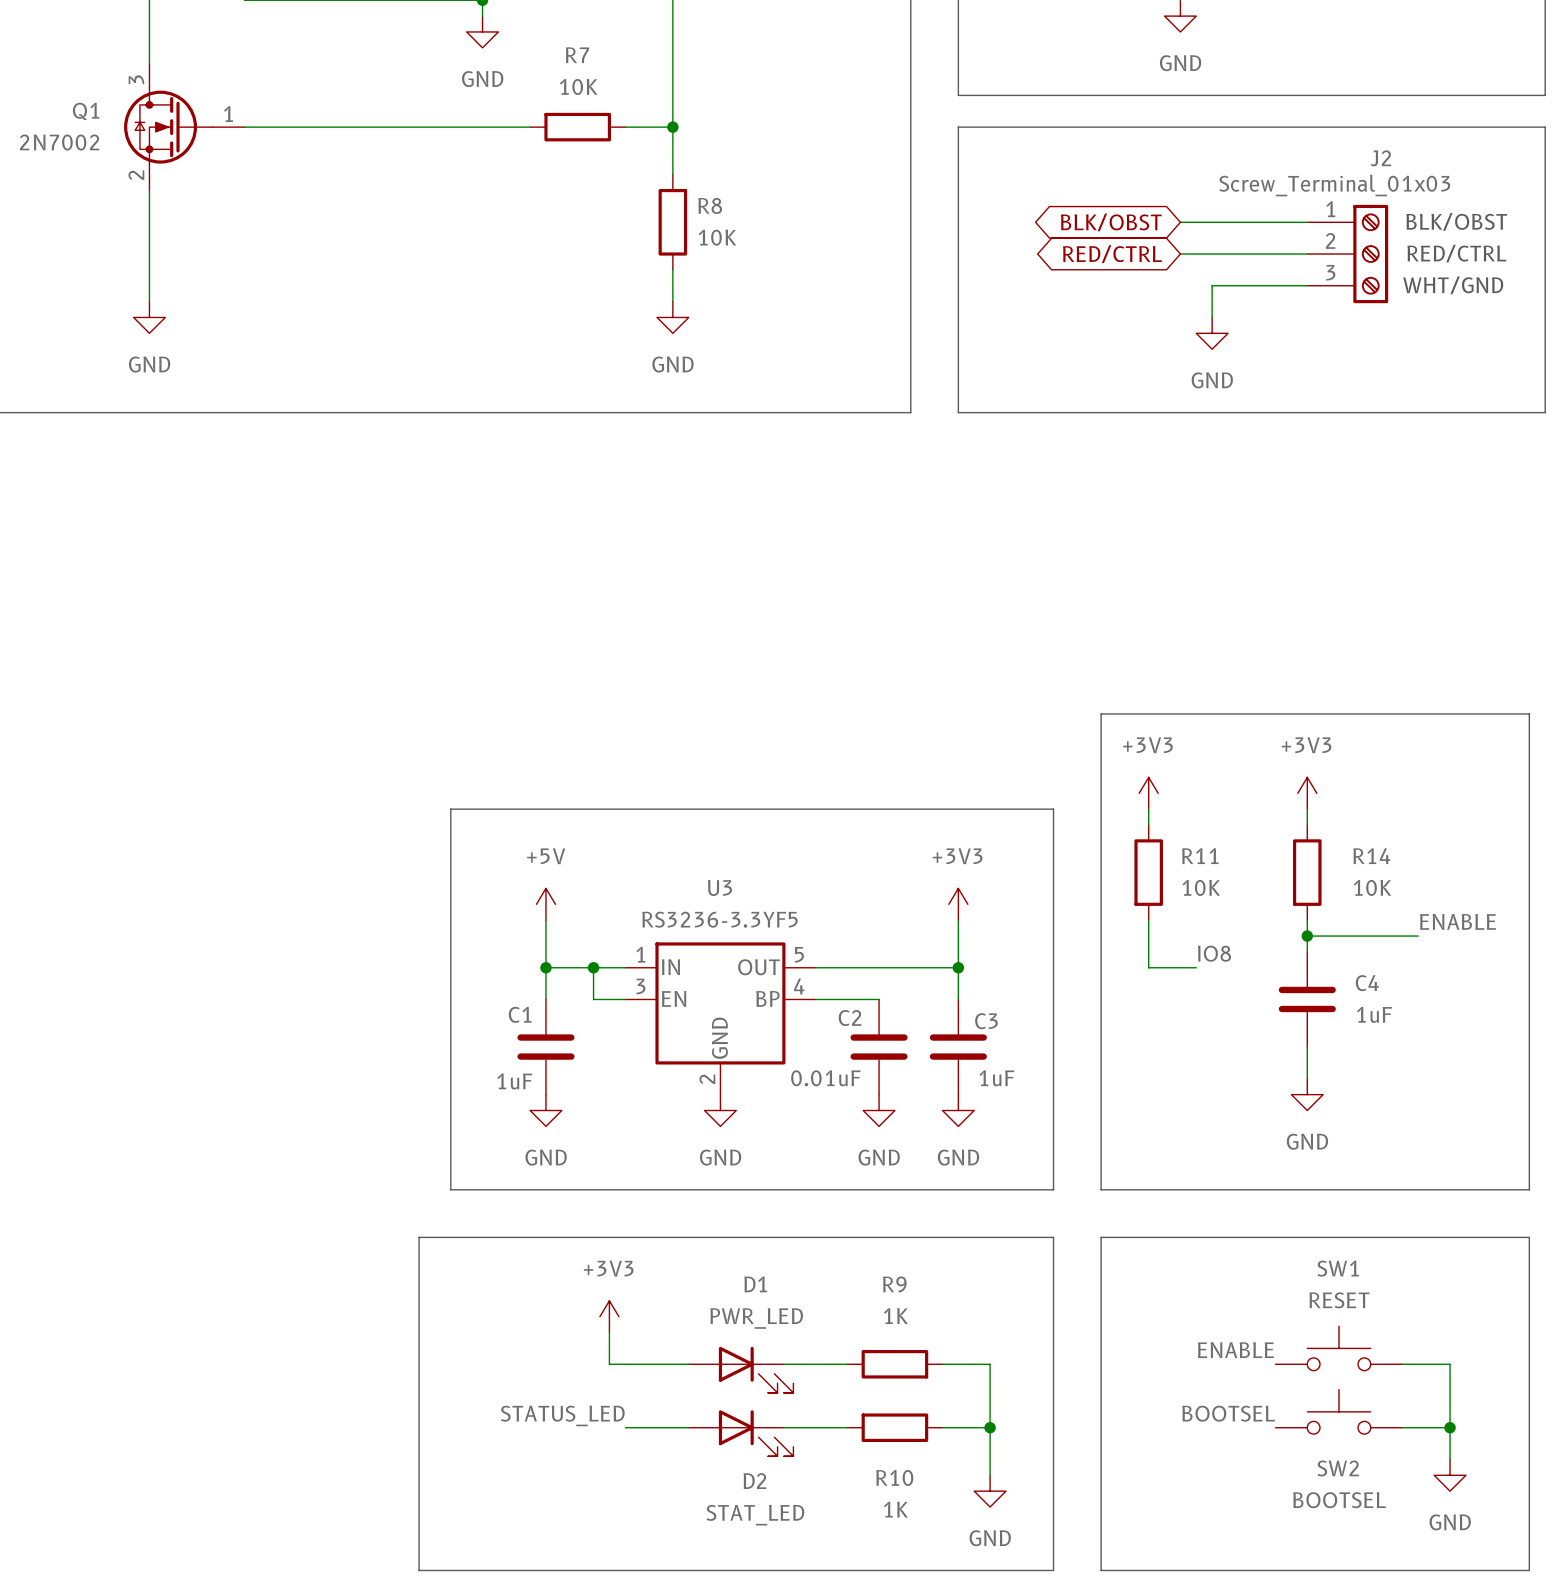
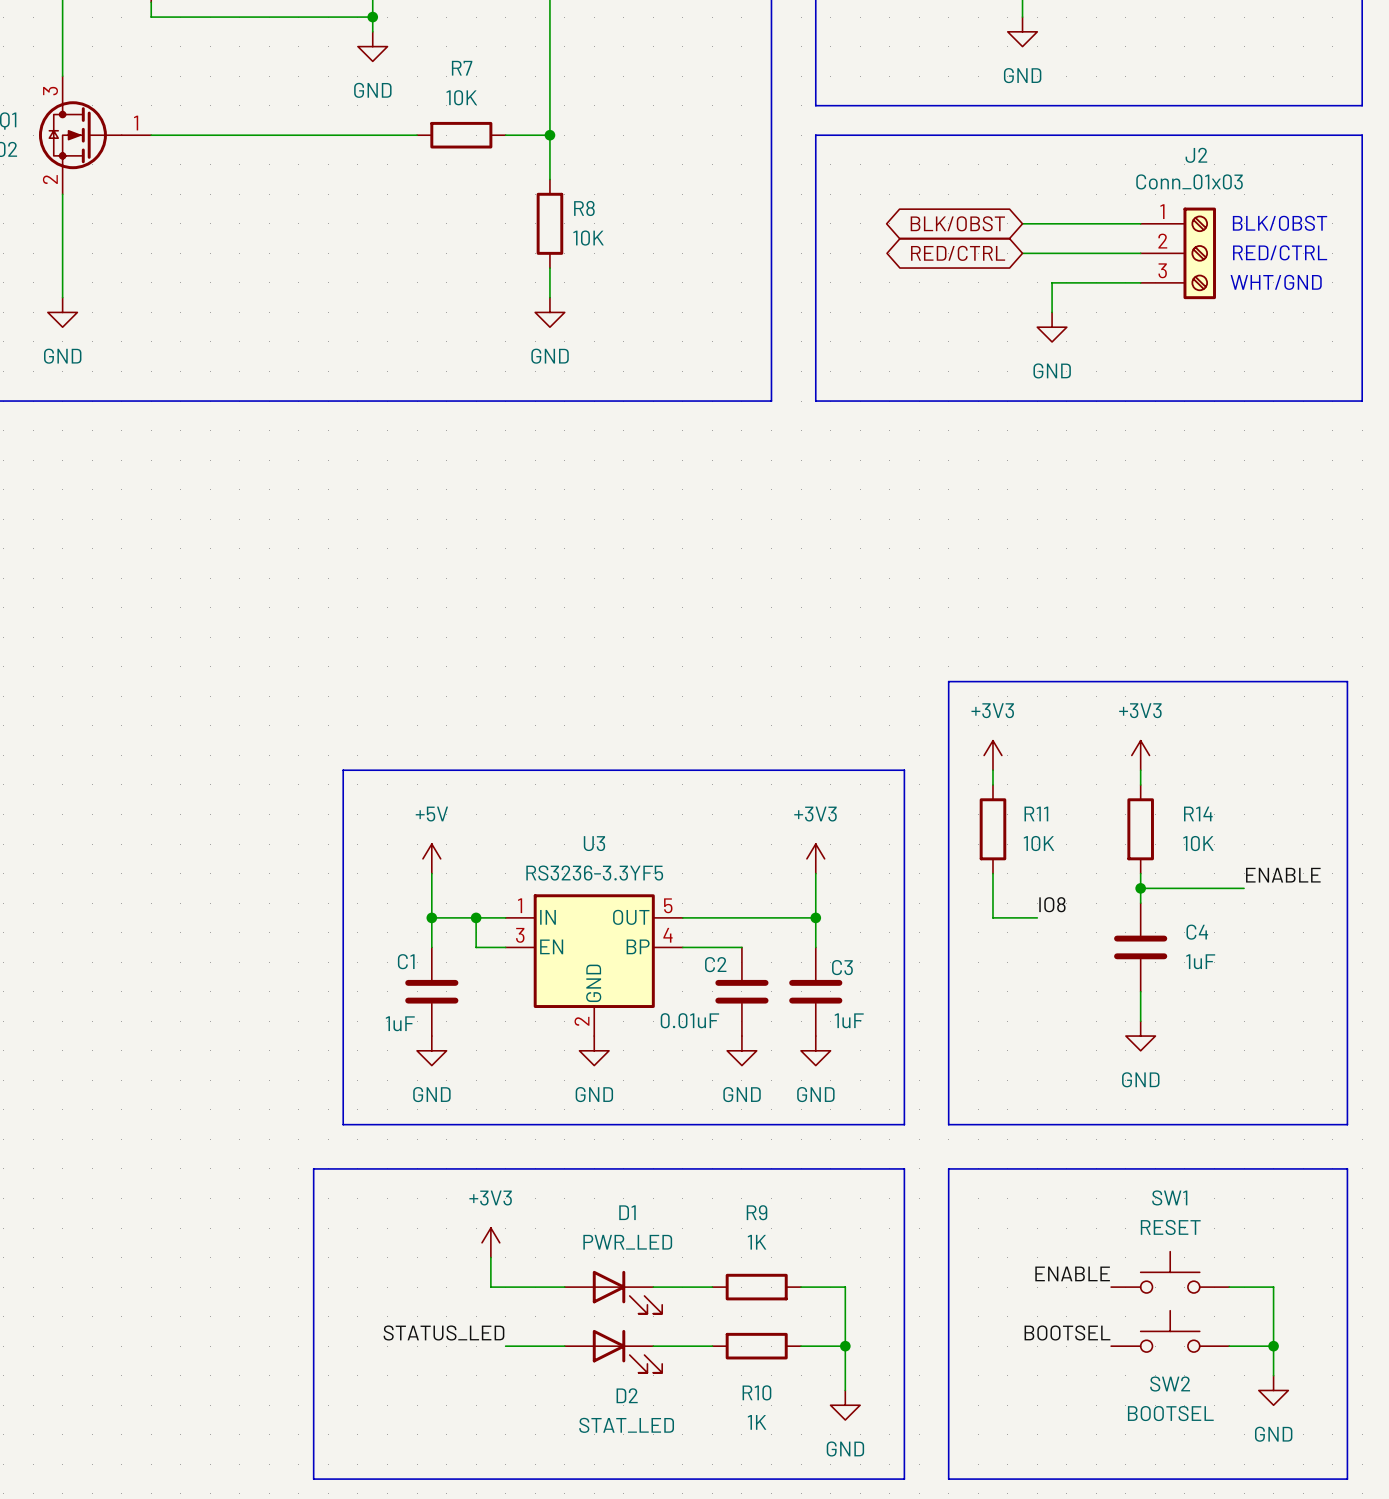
J2 name position: J2 (1380, 158) -> J2 (1196, 155)
J2 value: Screw_Terminal_01x03 (1334, 185) -> Conn_01x03 (1189, 181)

